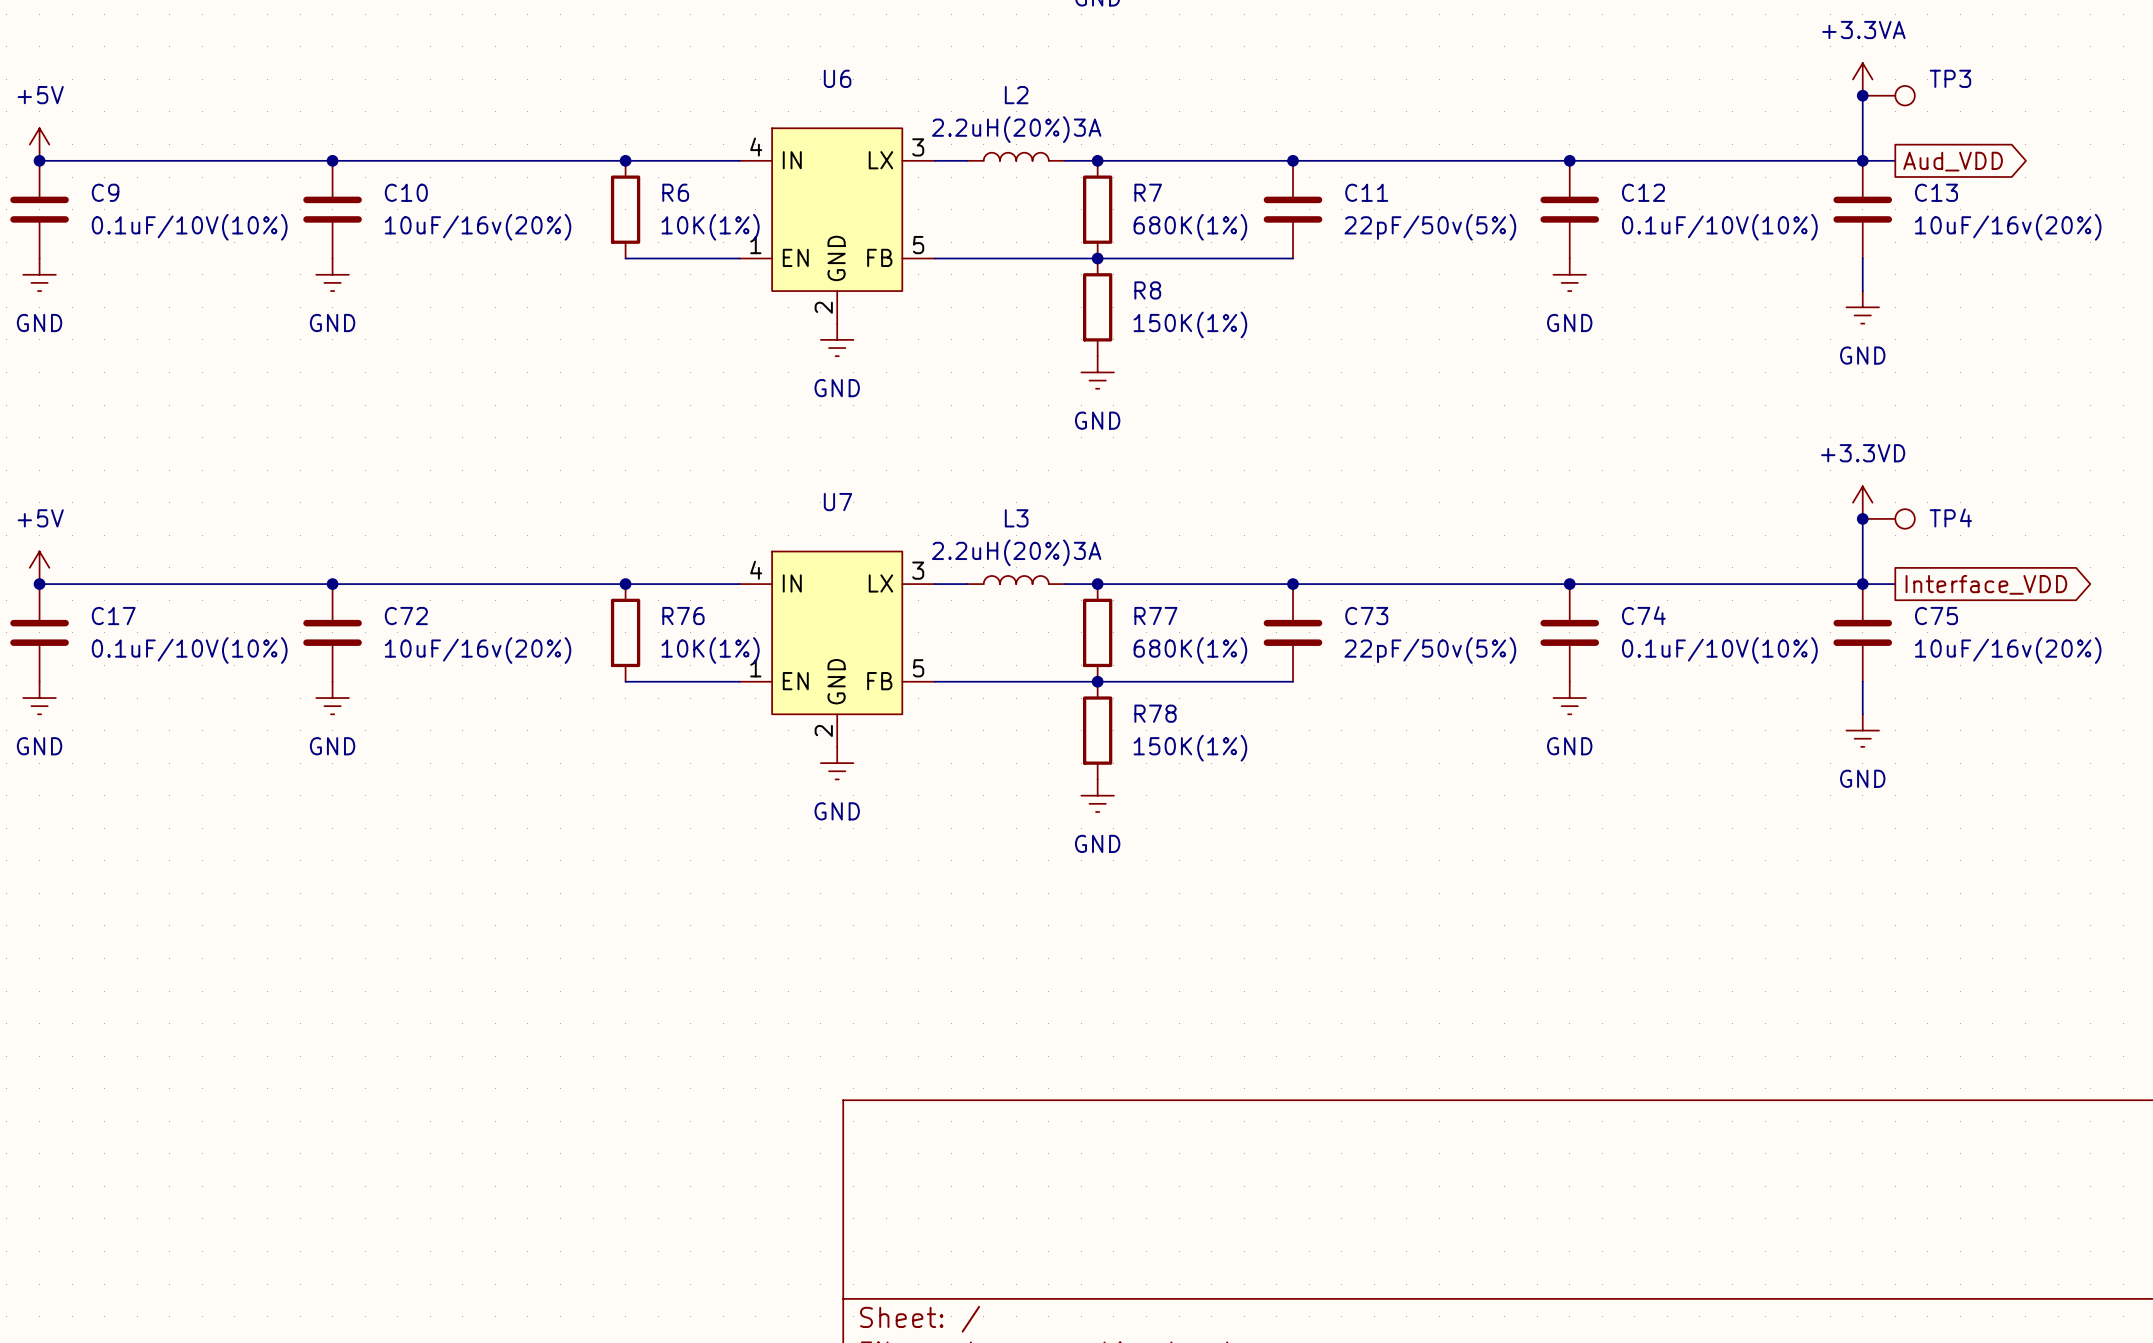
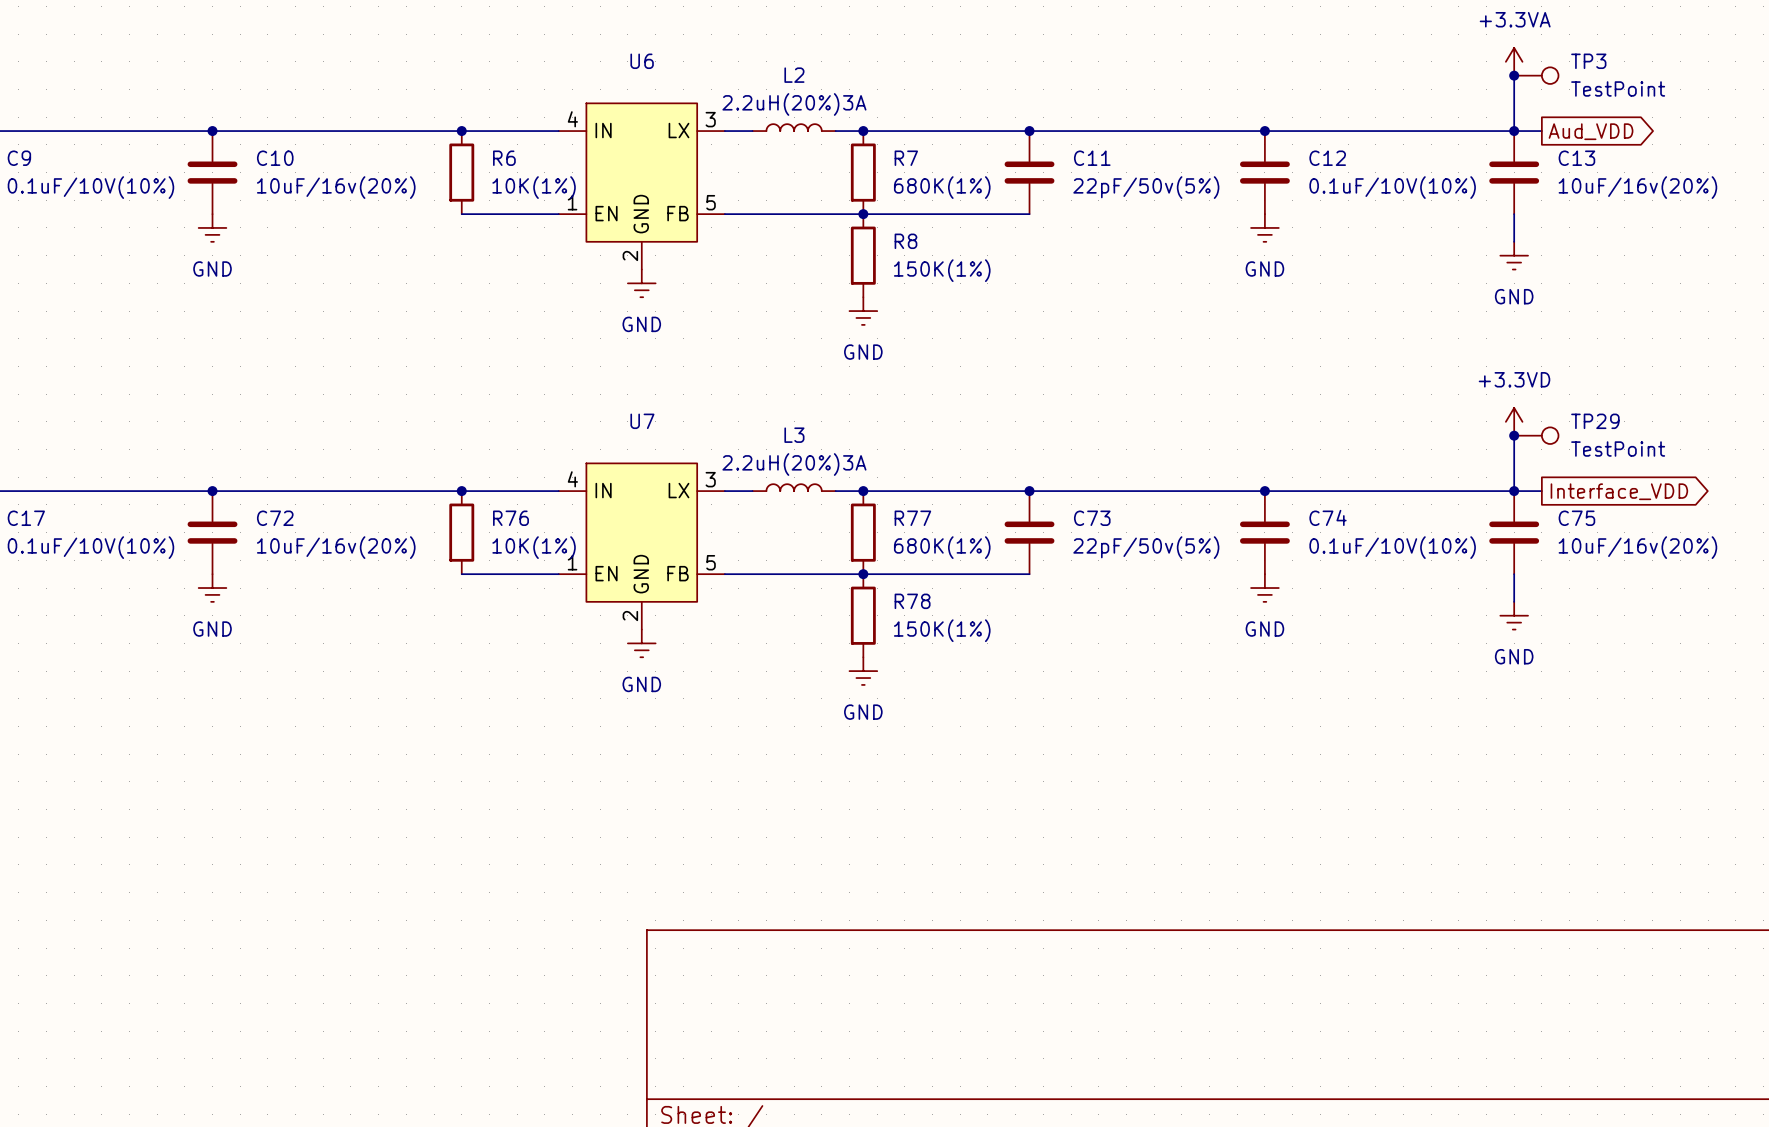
TP3 value: none -> TestPoint (1618, 88)
TP4 name: TP4 (1950, 517) -> TP29 (1595, 421)
TP4 value: none -> TestPoint (1618, 449)

